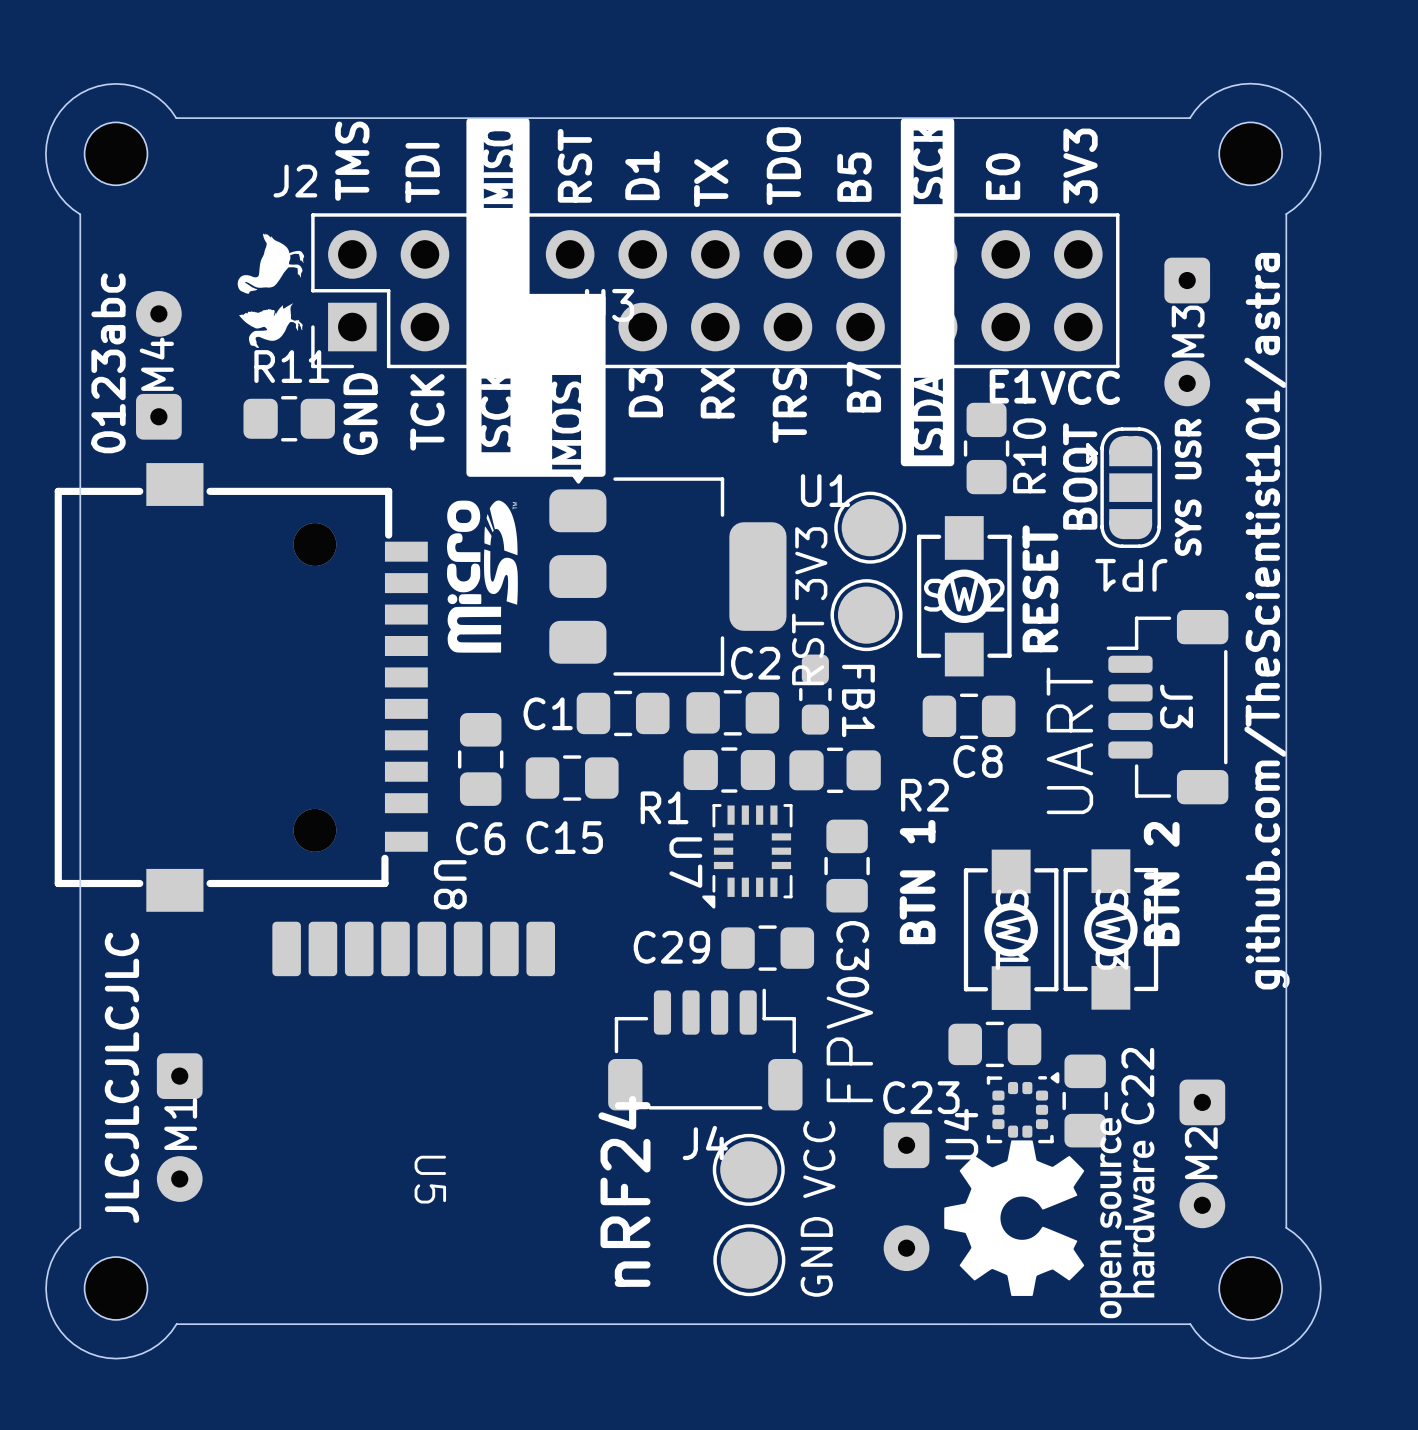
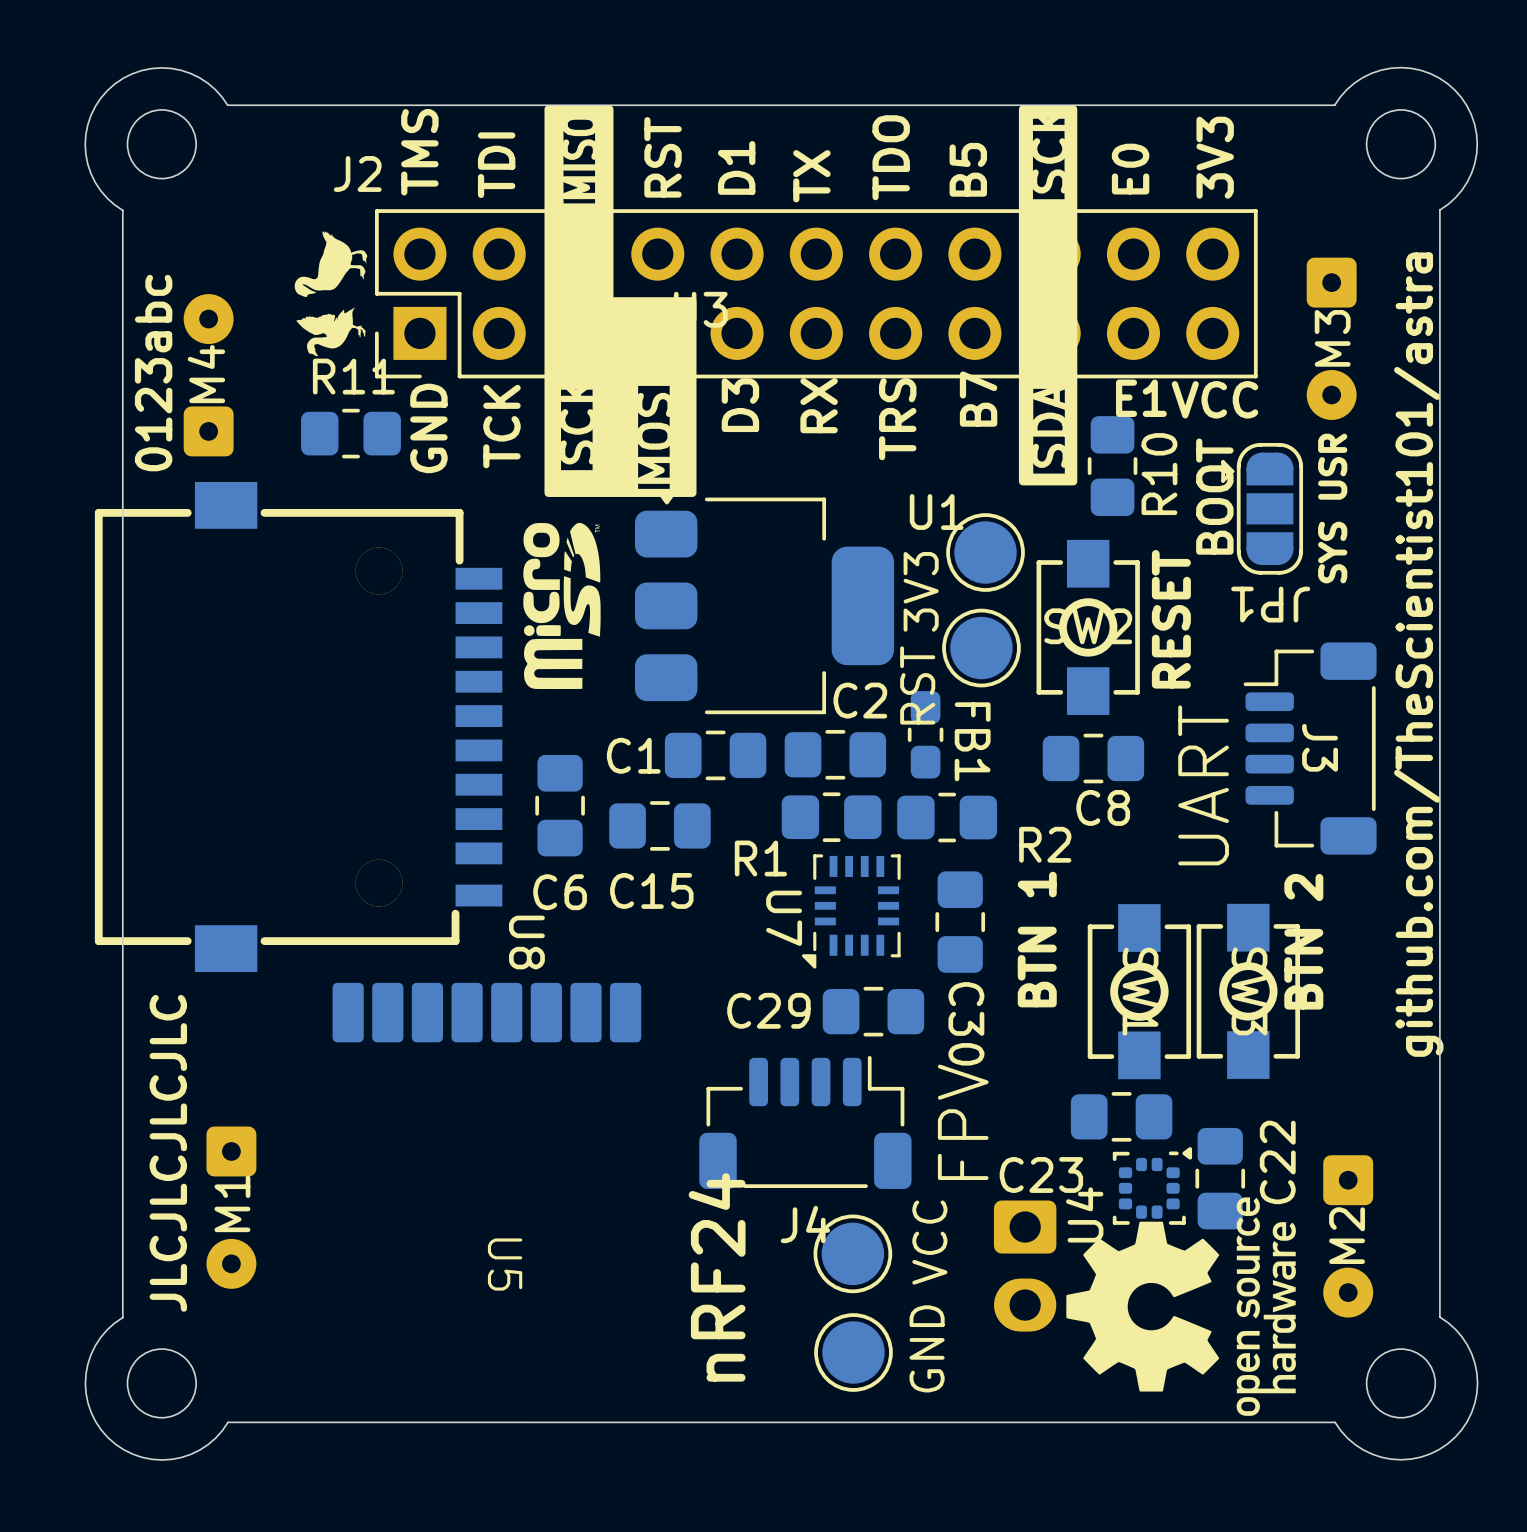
part footprint: [883, 1122, 930, 1272] -> [993, 1200, 1057, 1332]

